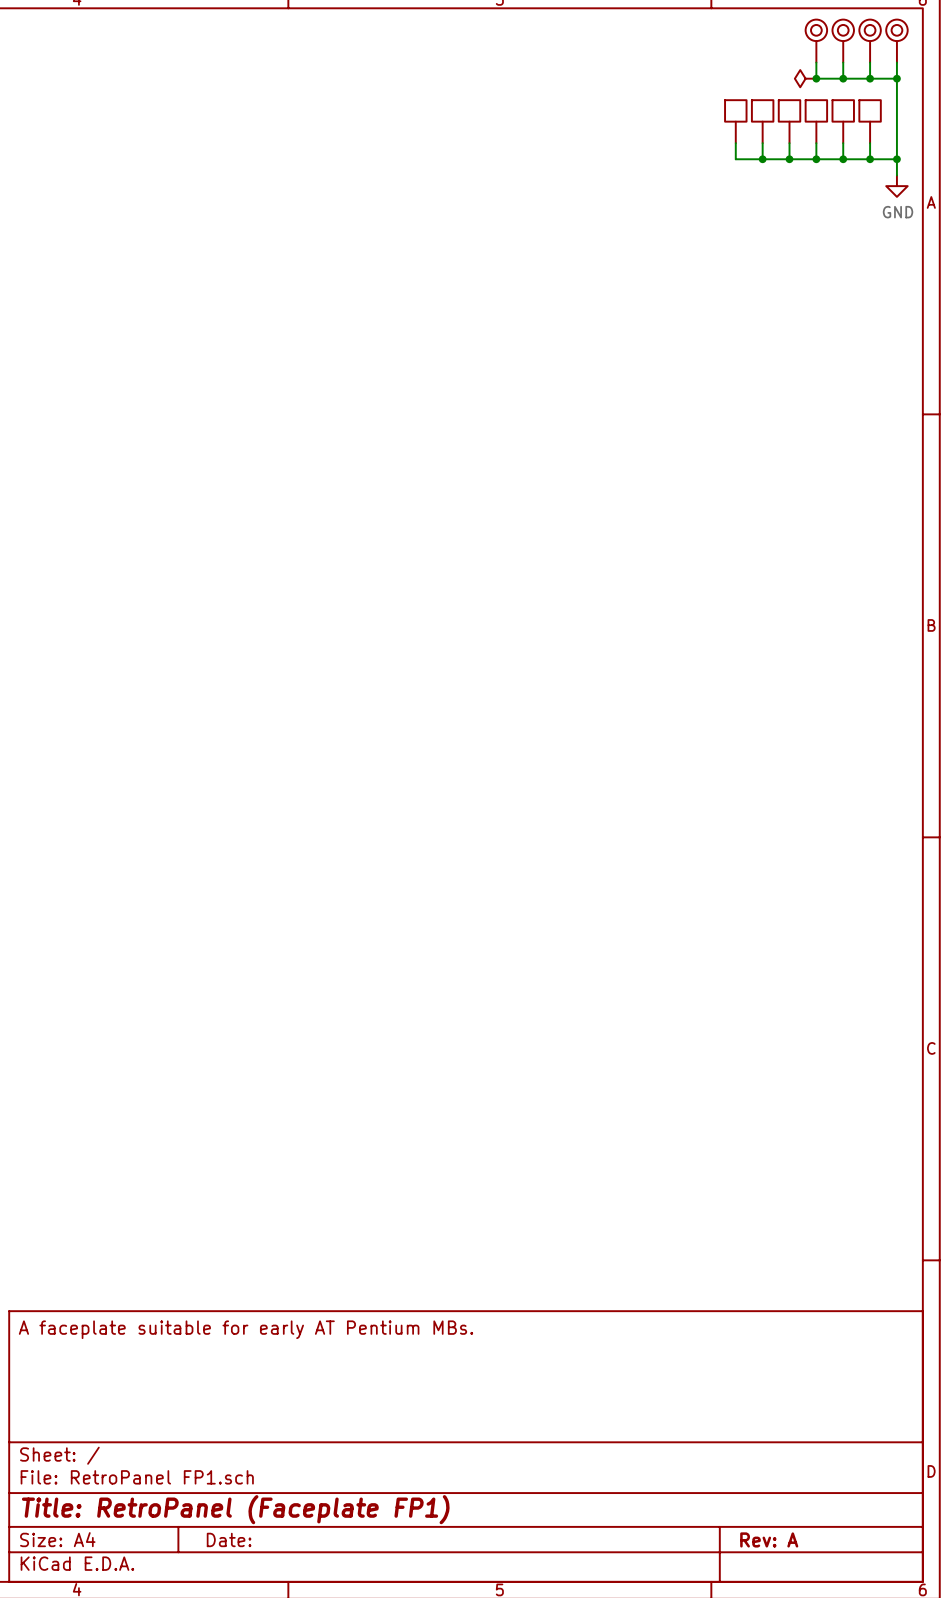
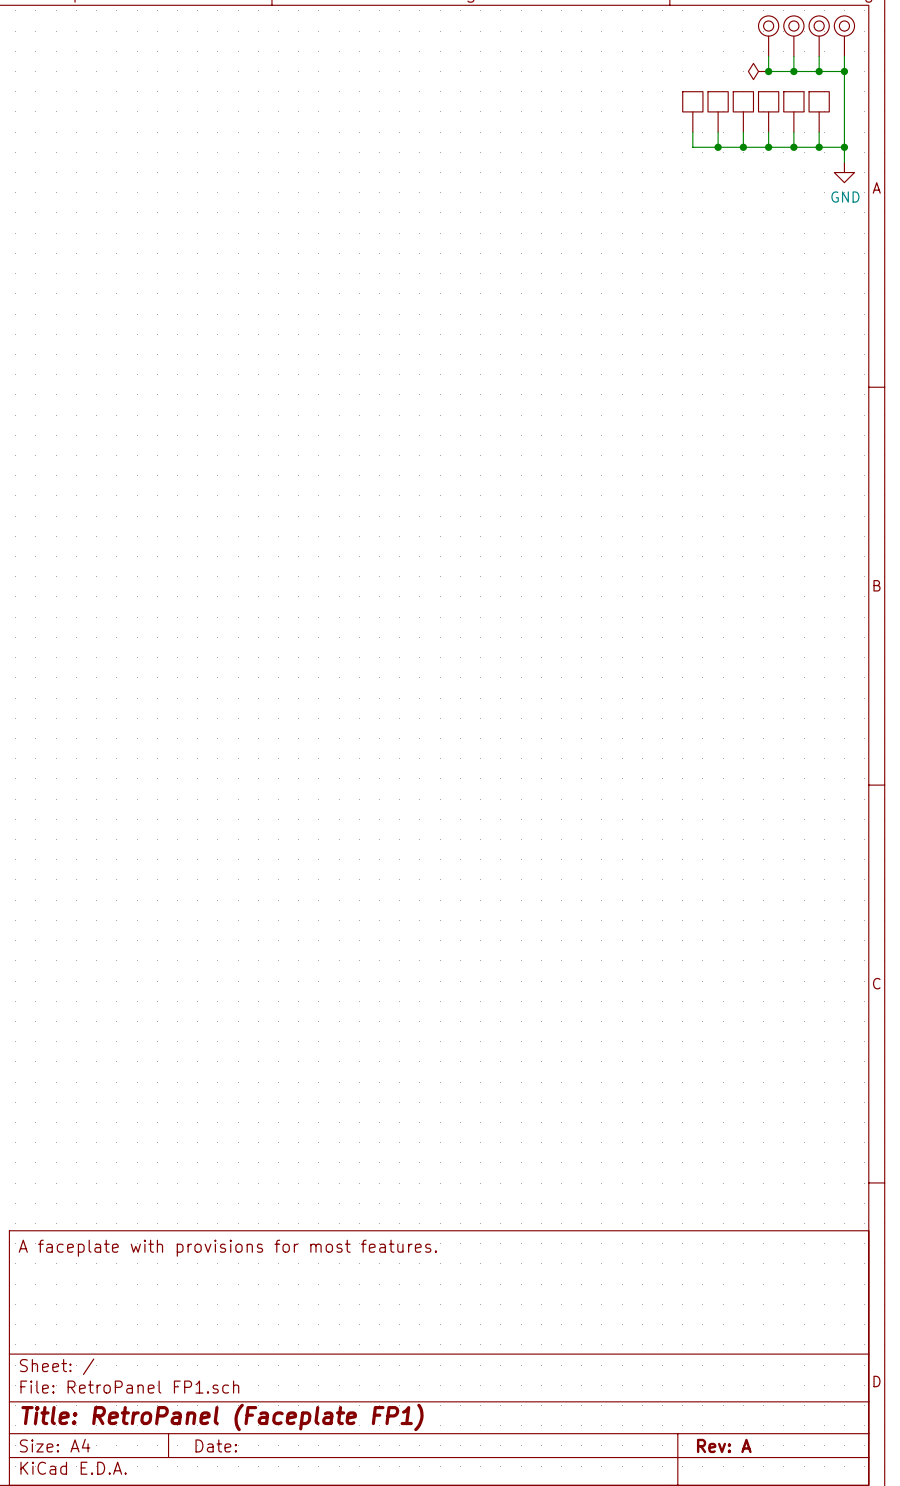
title block: A faceplate suitable for early AT Pentium MBs. (246, 1329) -> A faceplate with provisions for most features. (227, 1248)

